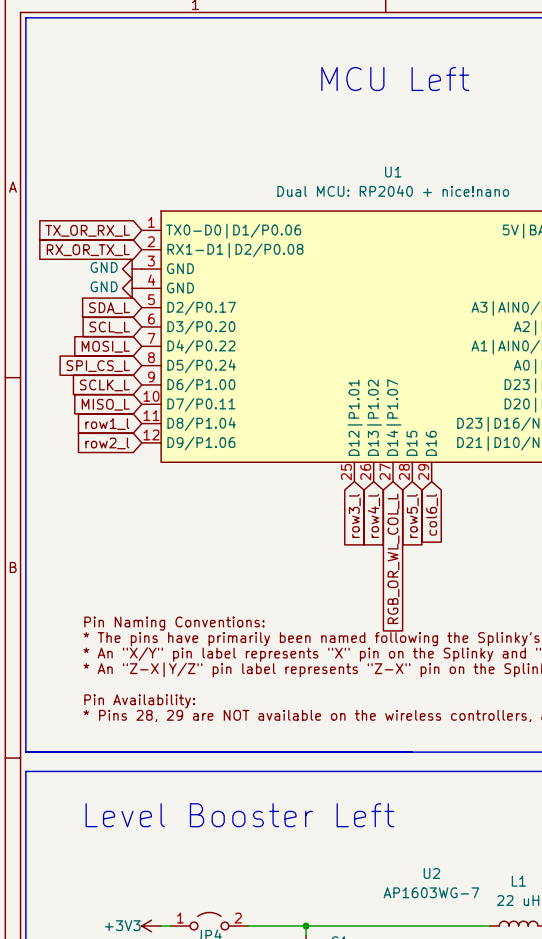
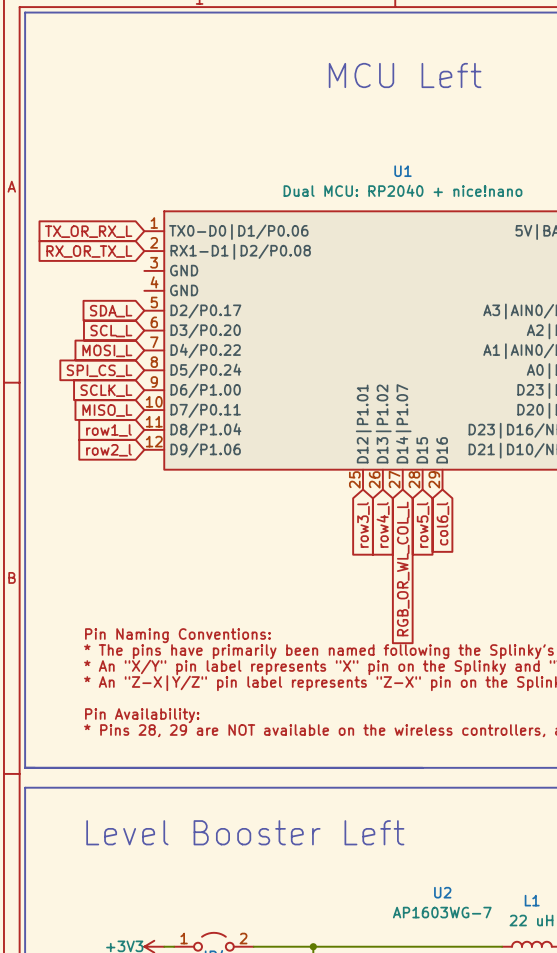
power symbol: GND (132, 269) -> none
power symbol: GND (132, 288) -> none

